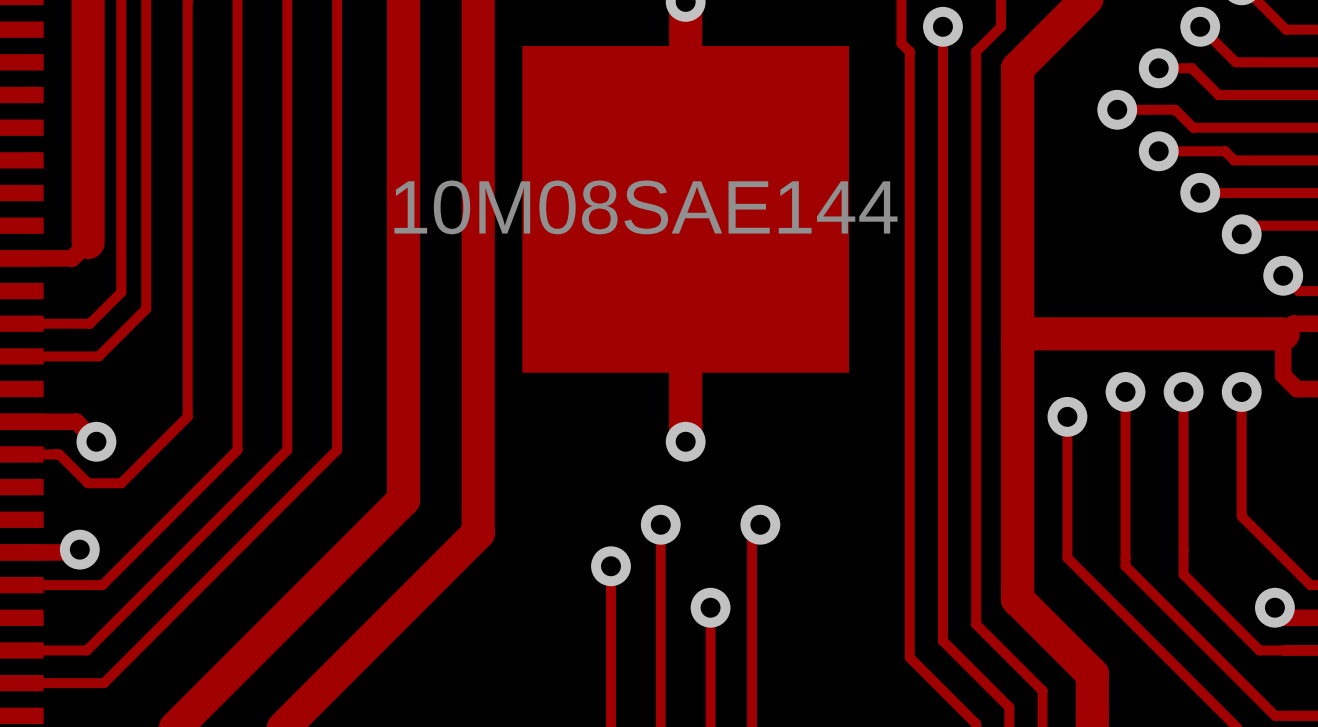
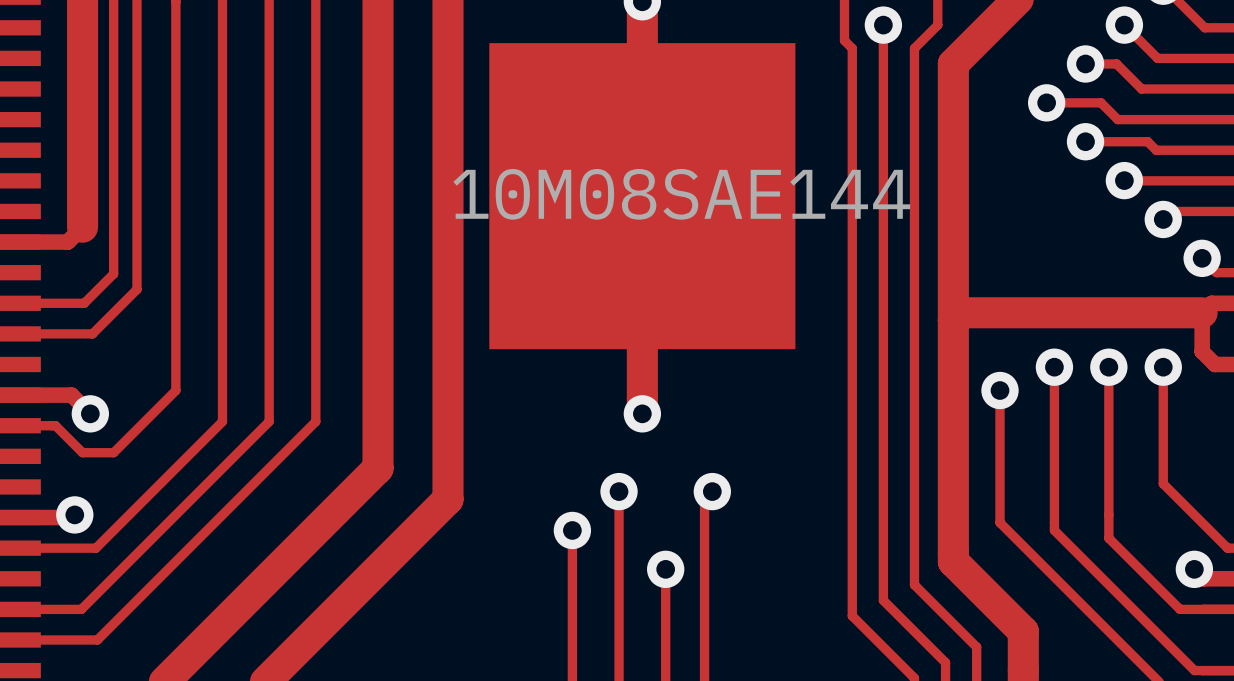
part value position: 10M08SAE144 (645, 207) -> 10M08SAE144 (681, 194)

